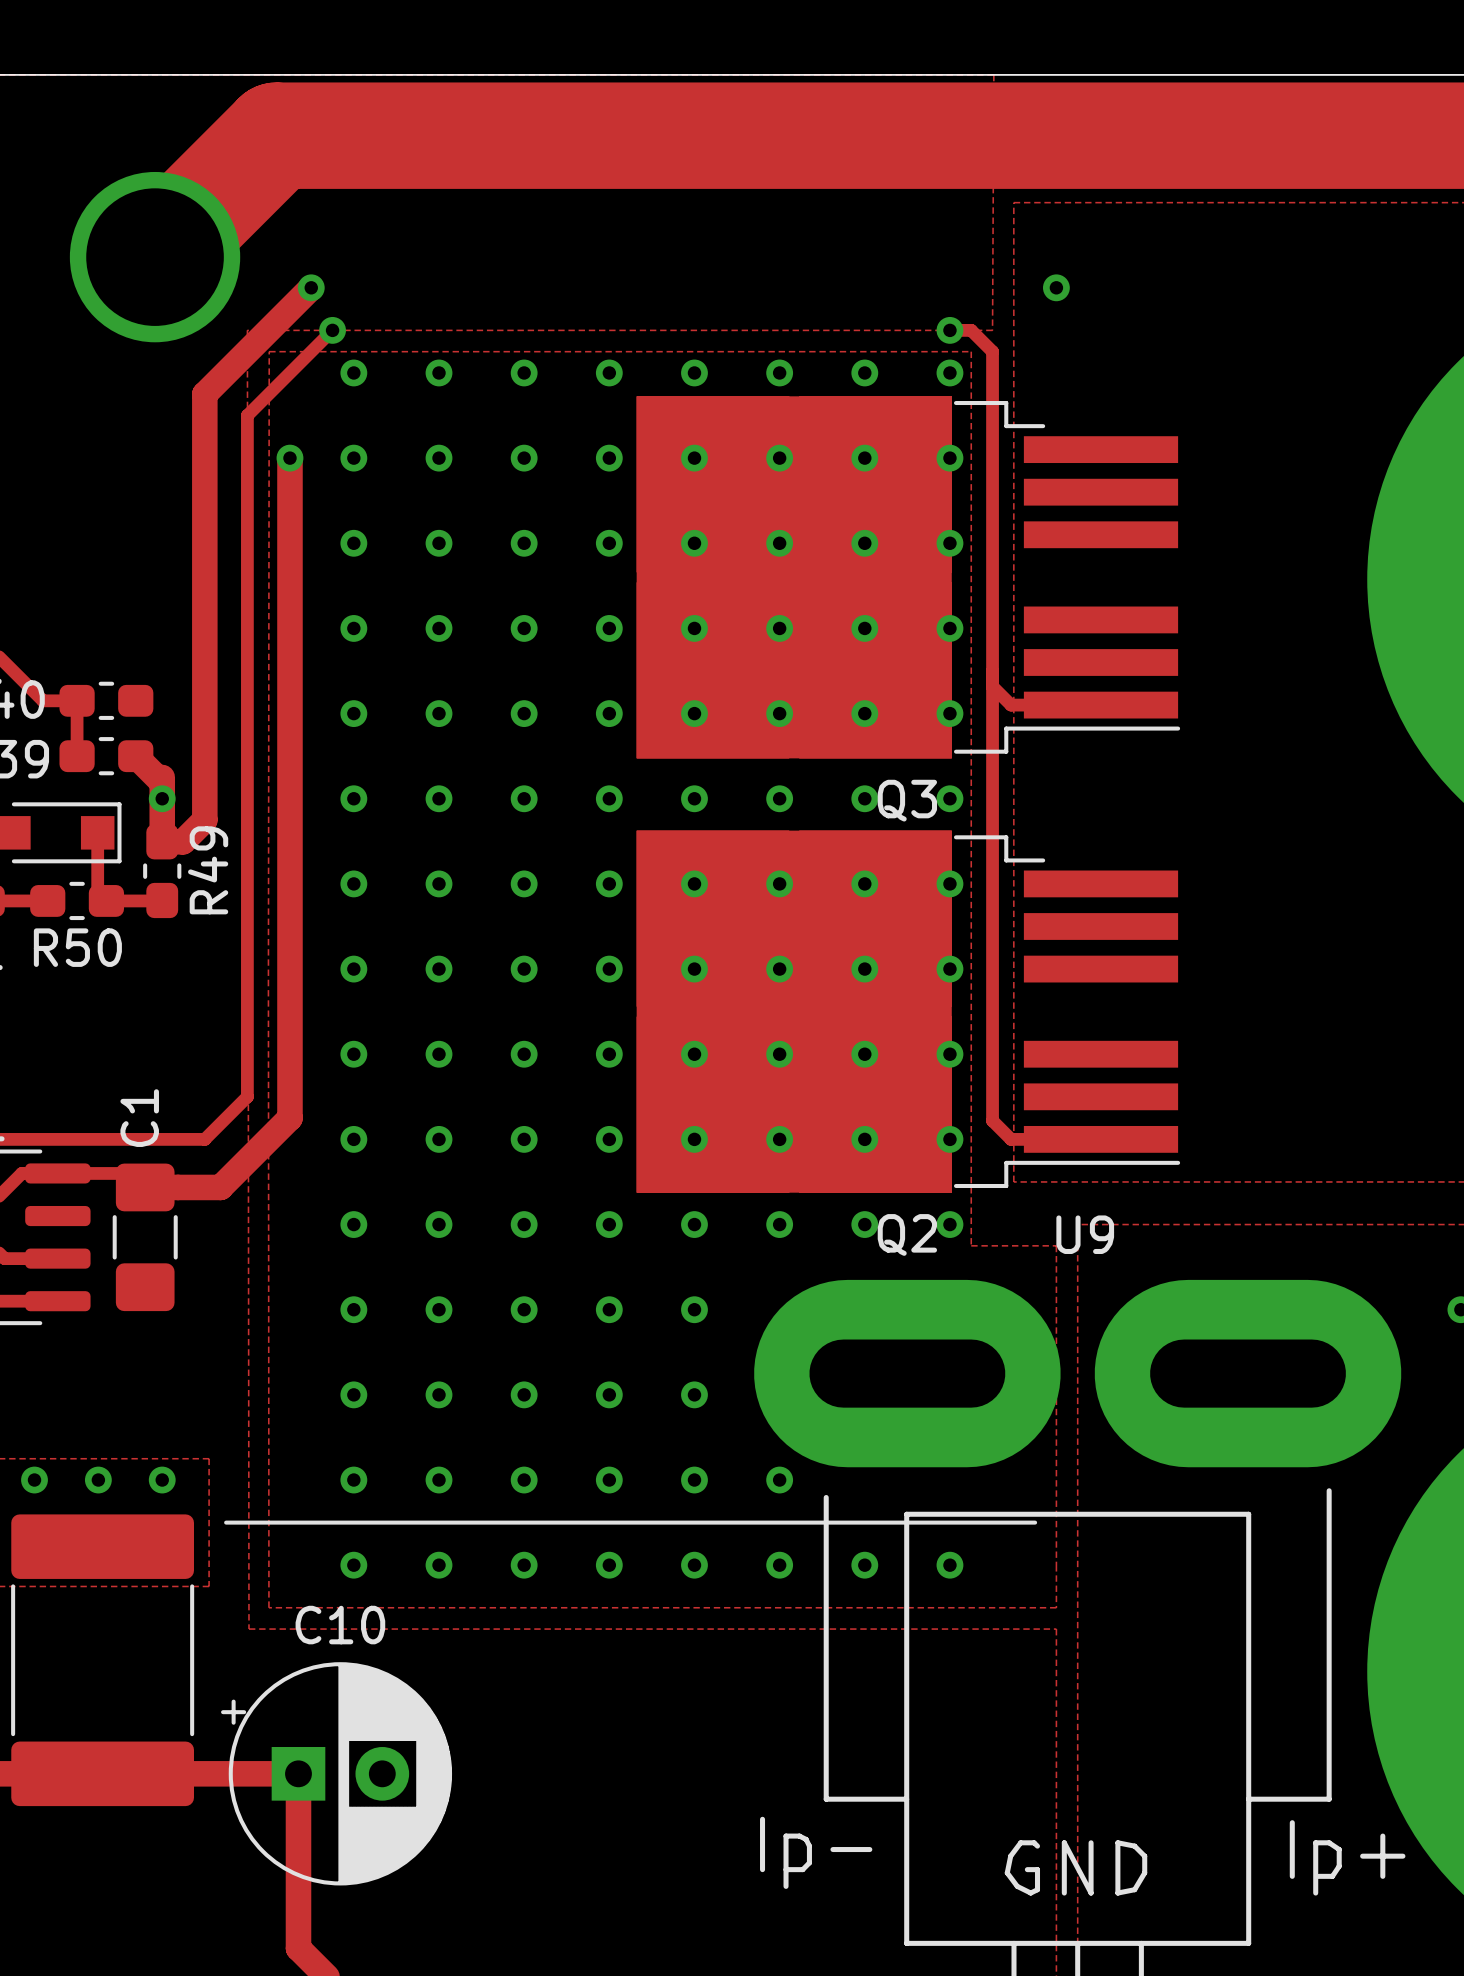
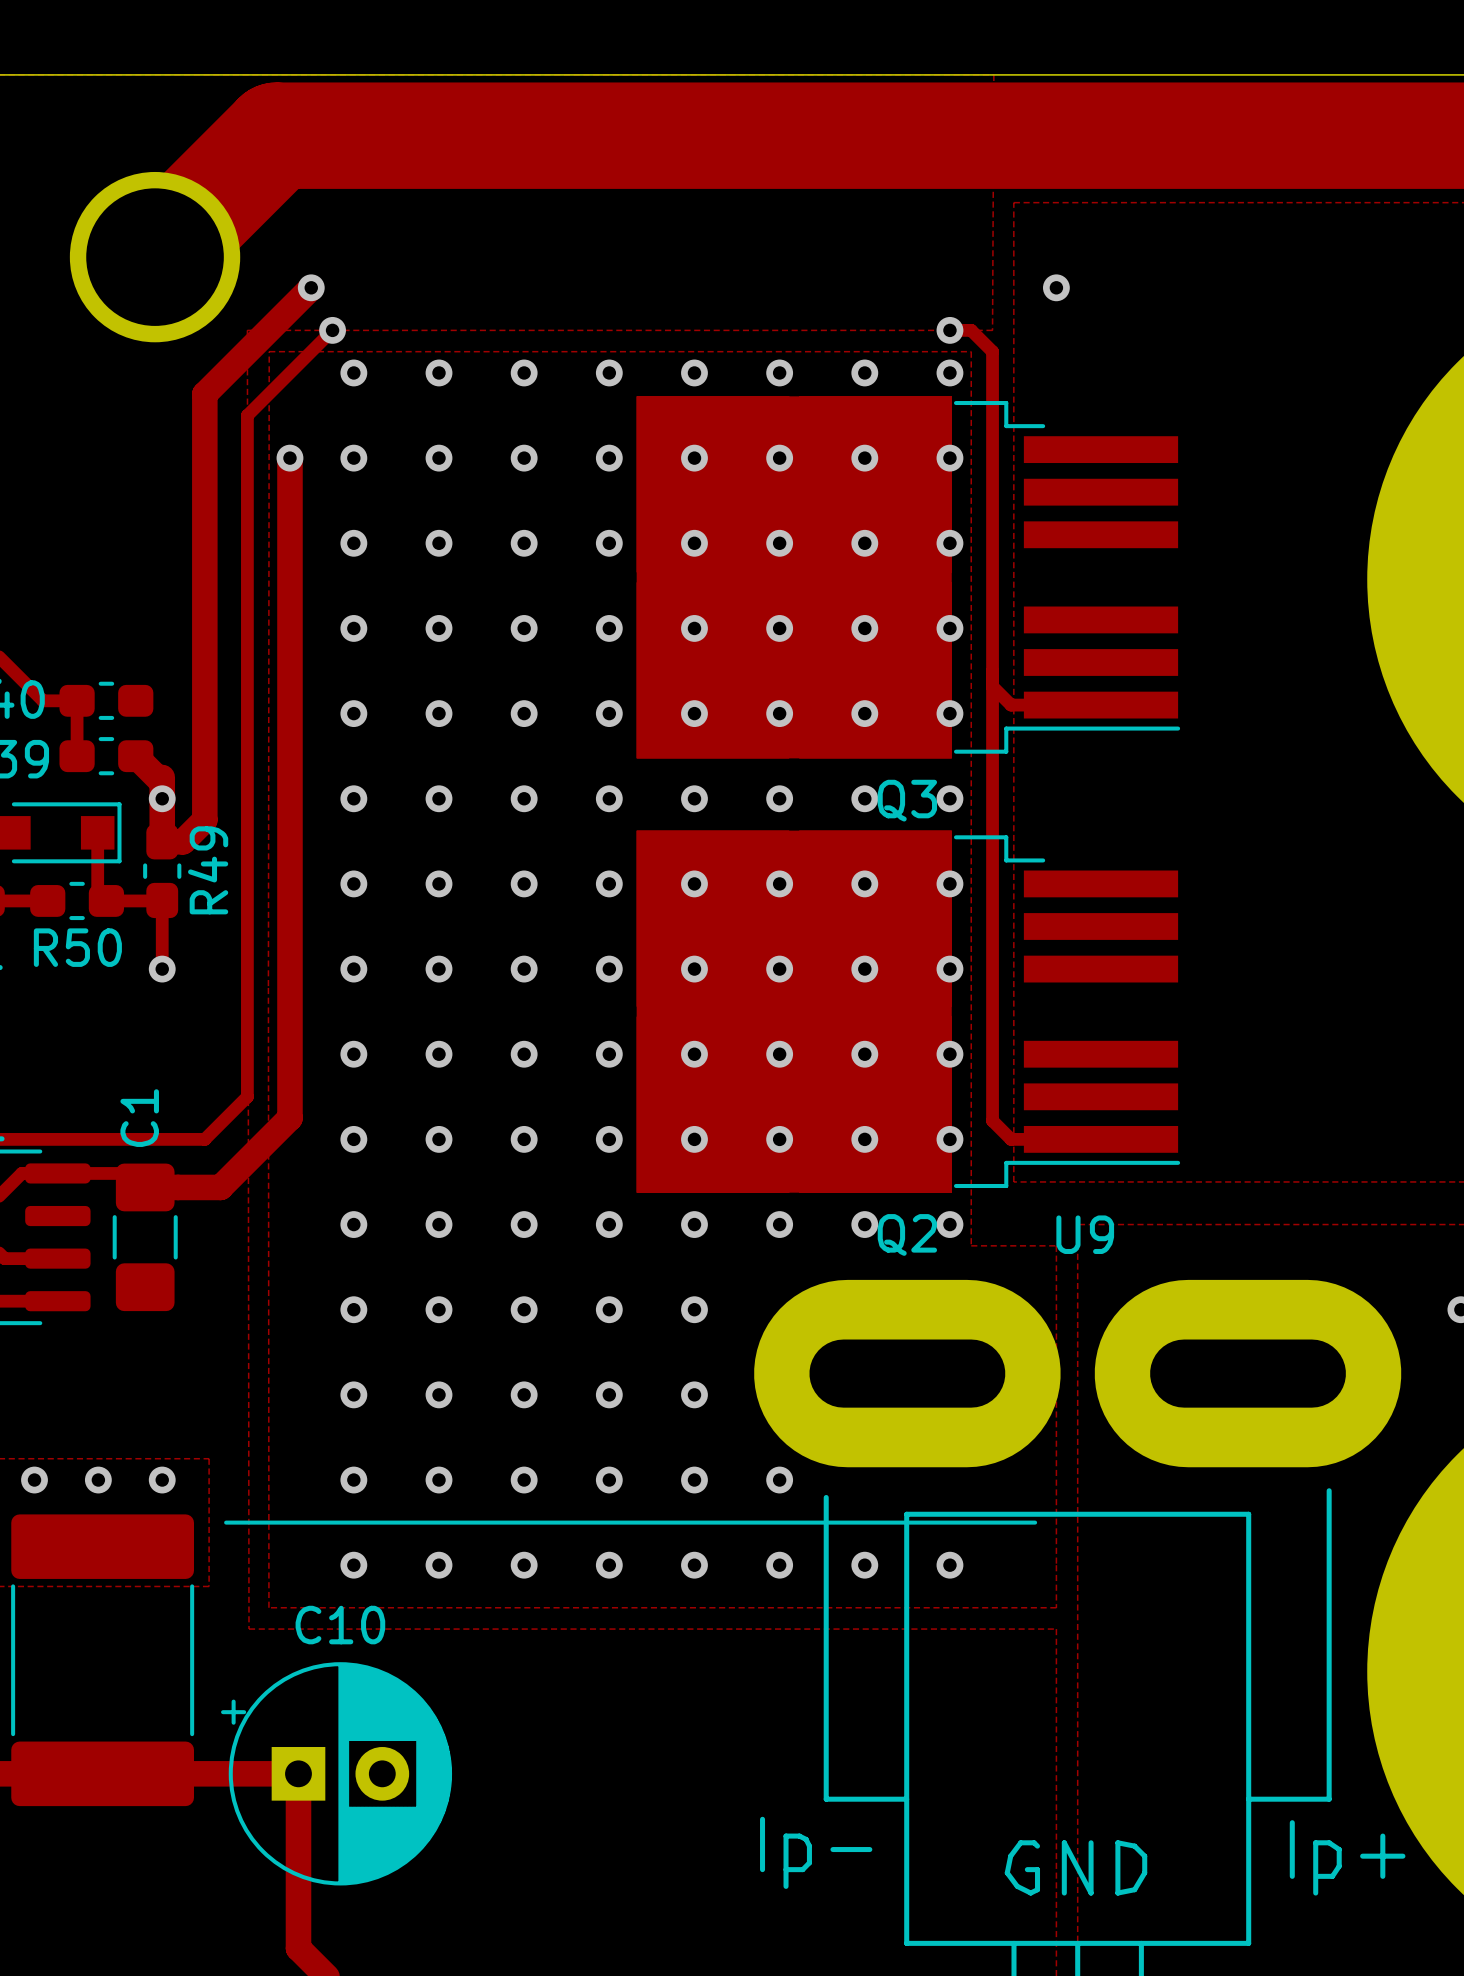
track: none -> (162, 900) (162, 969)
via: none -> (162, 969)

